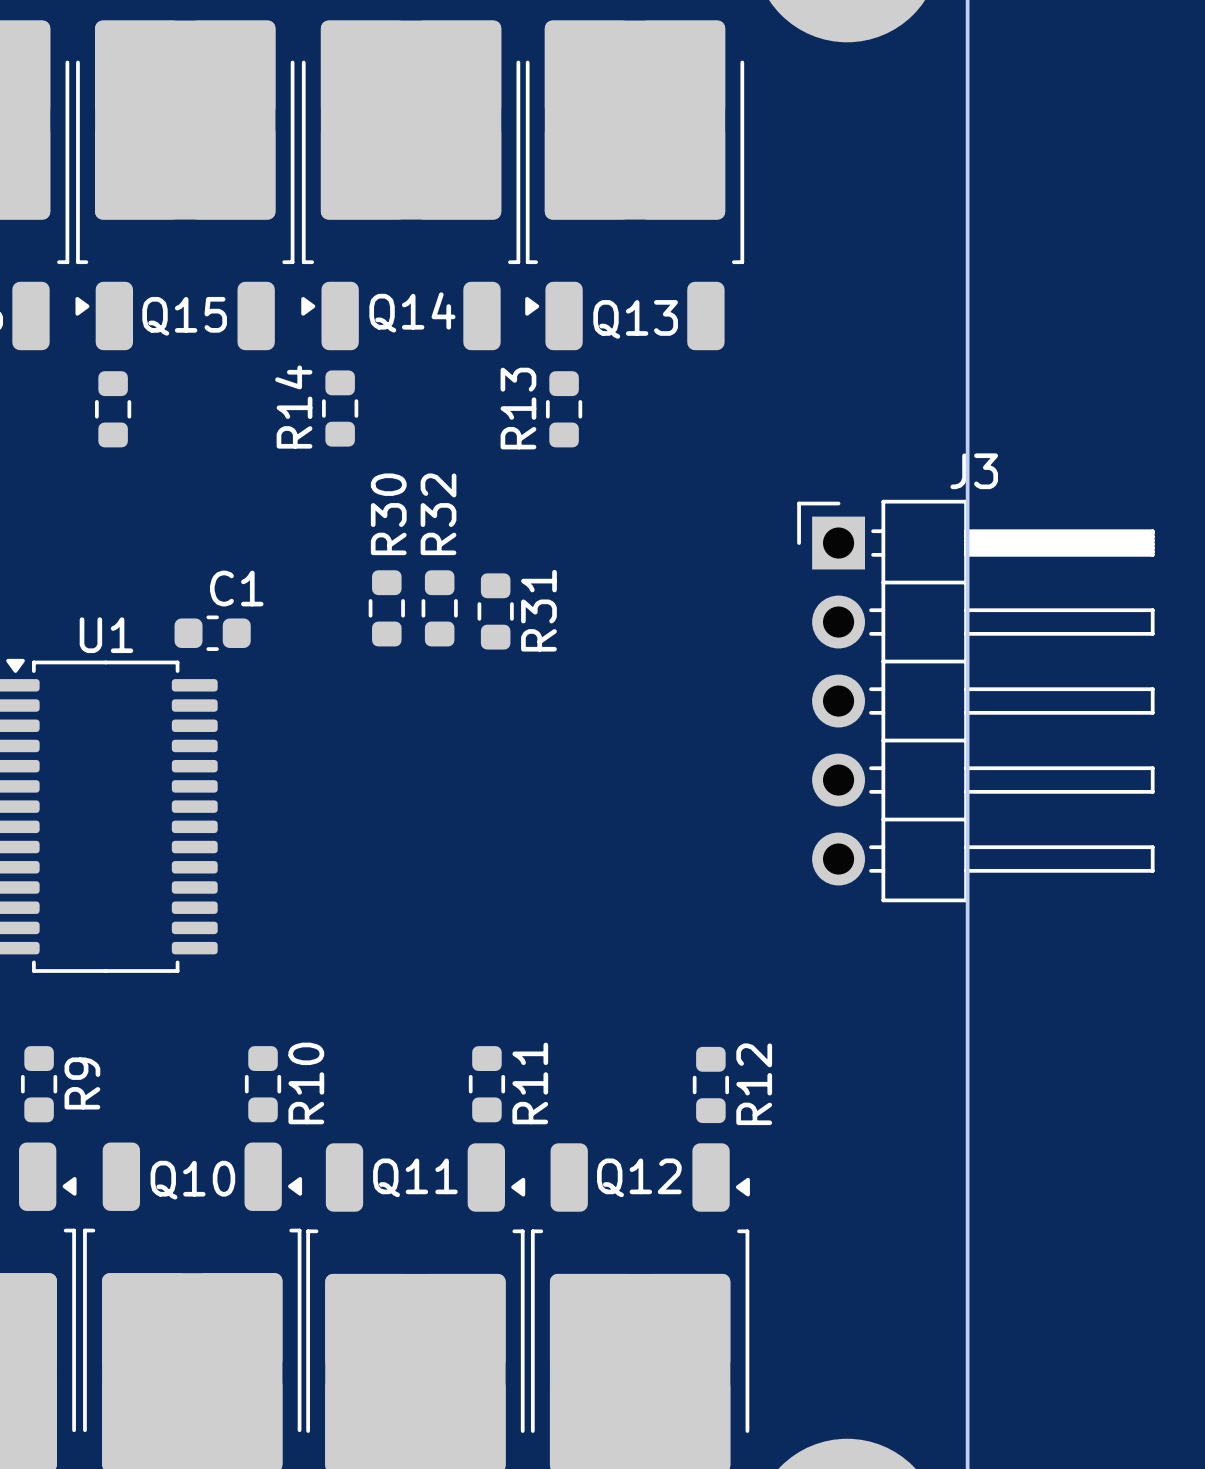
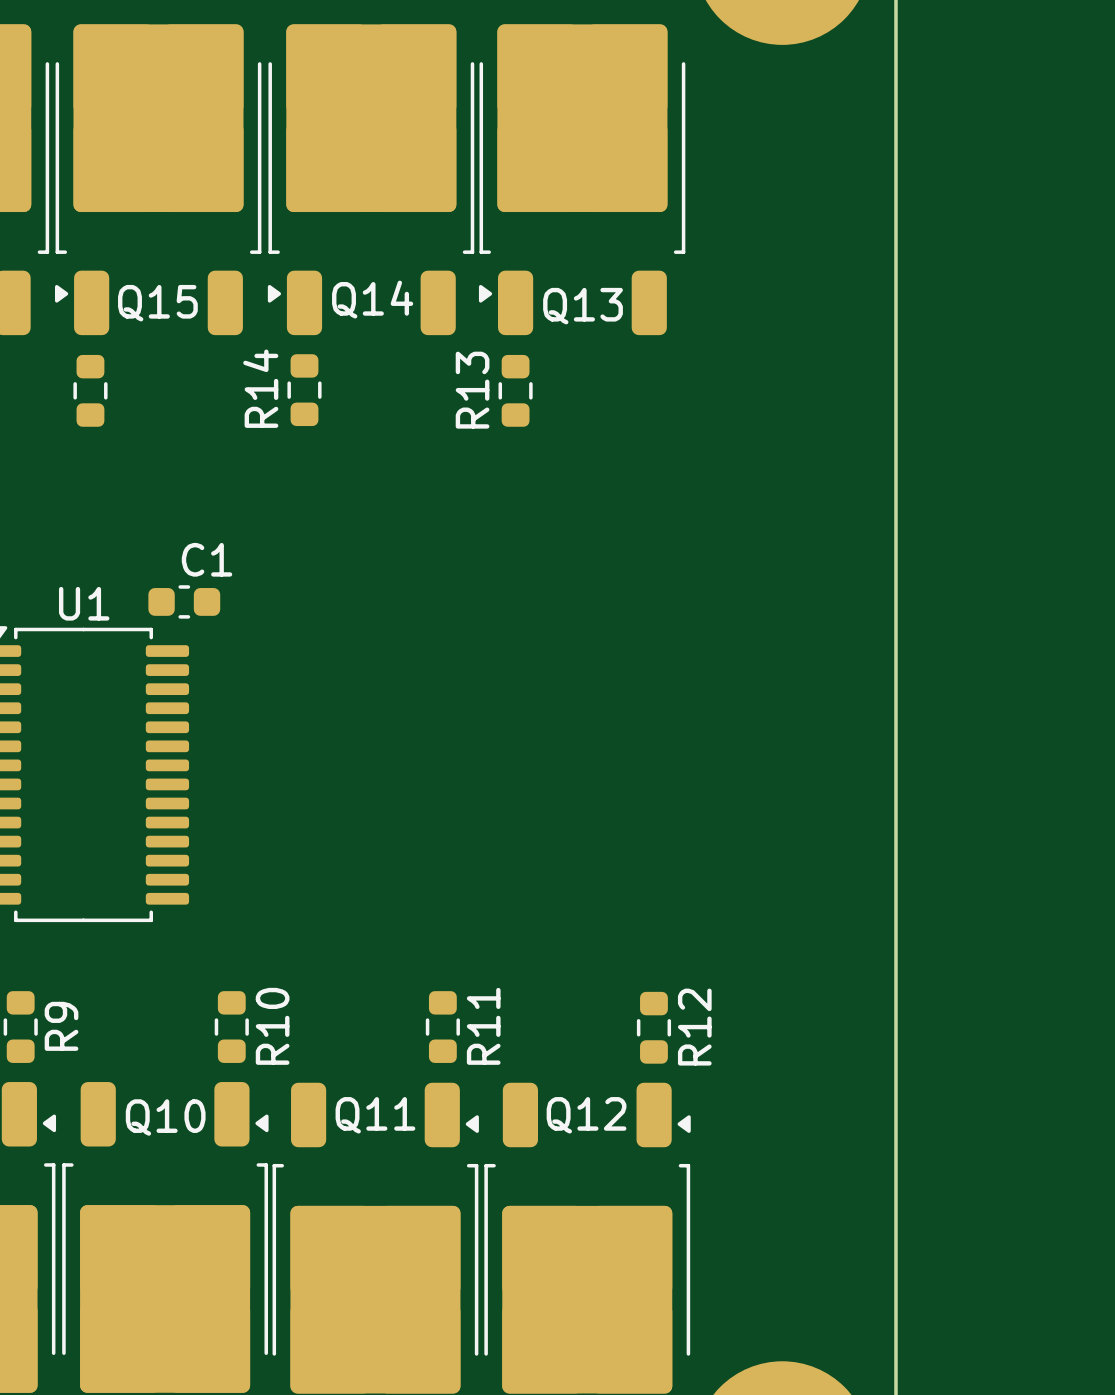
R30: (386, 608) -> none
R32: (439, 608) -> none
R31: (495, 611) -> none
J3: (975, 701) -> none

